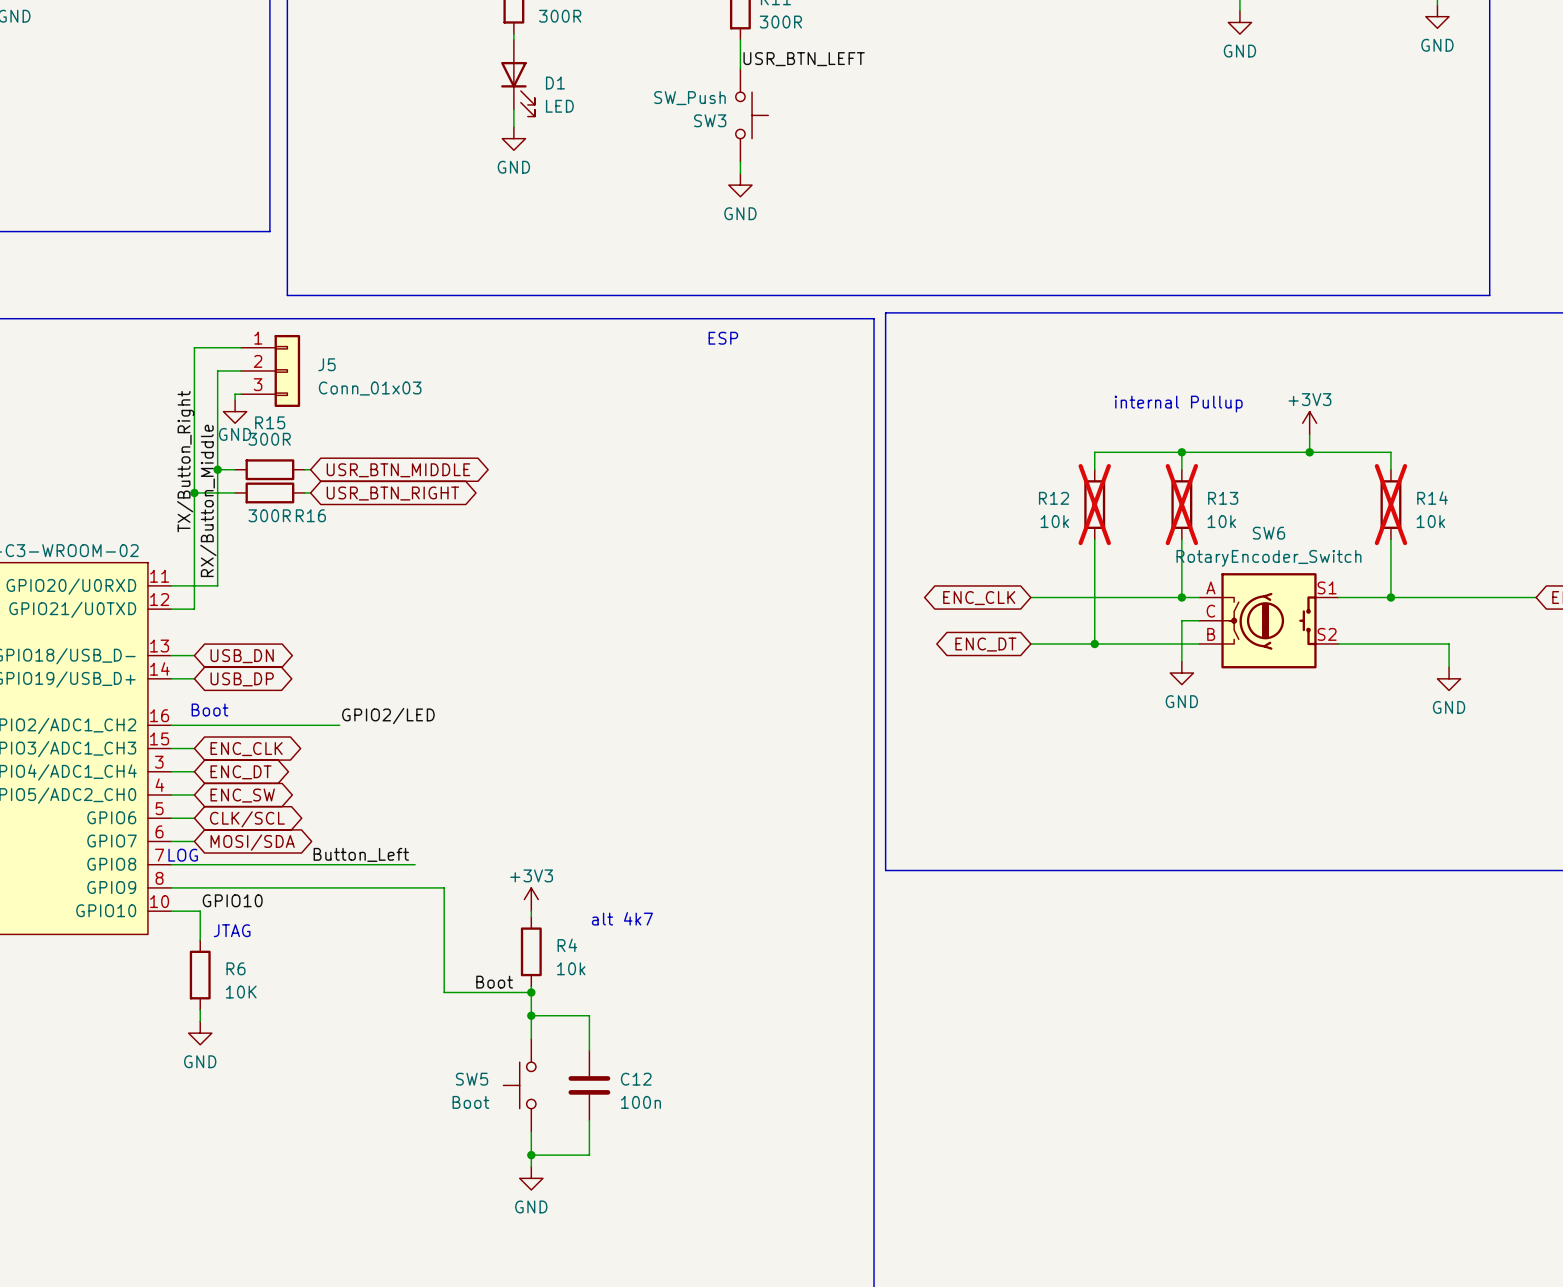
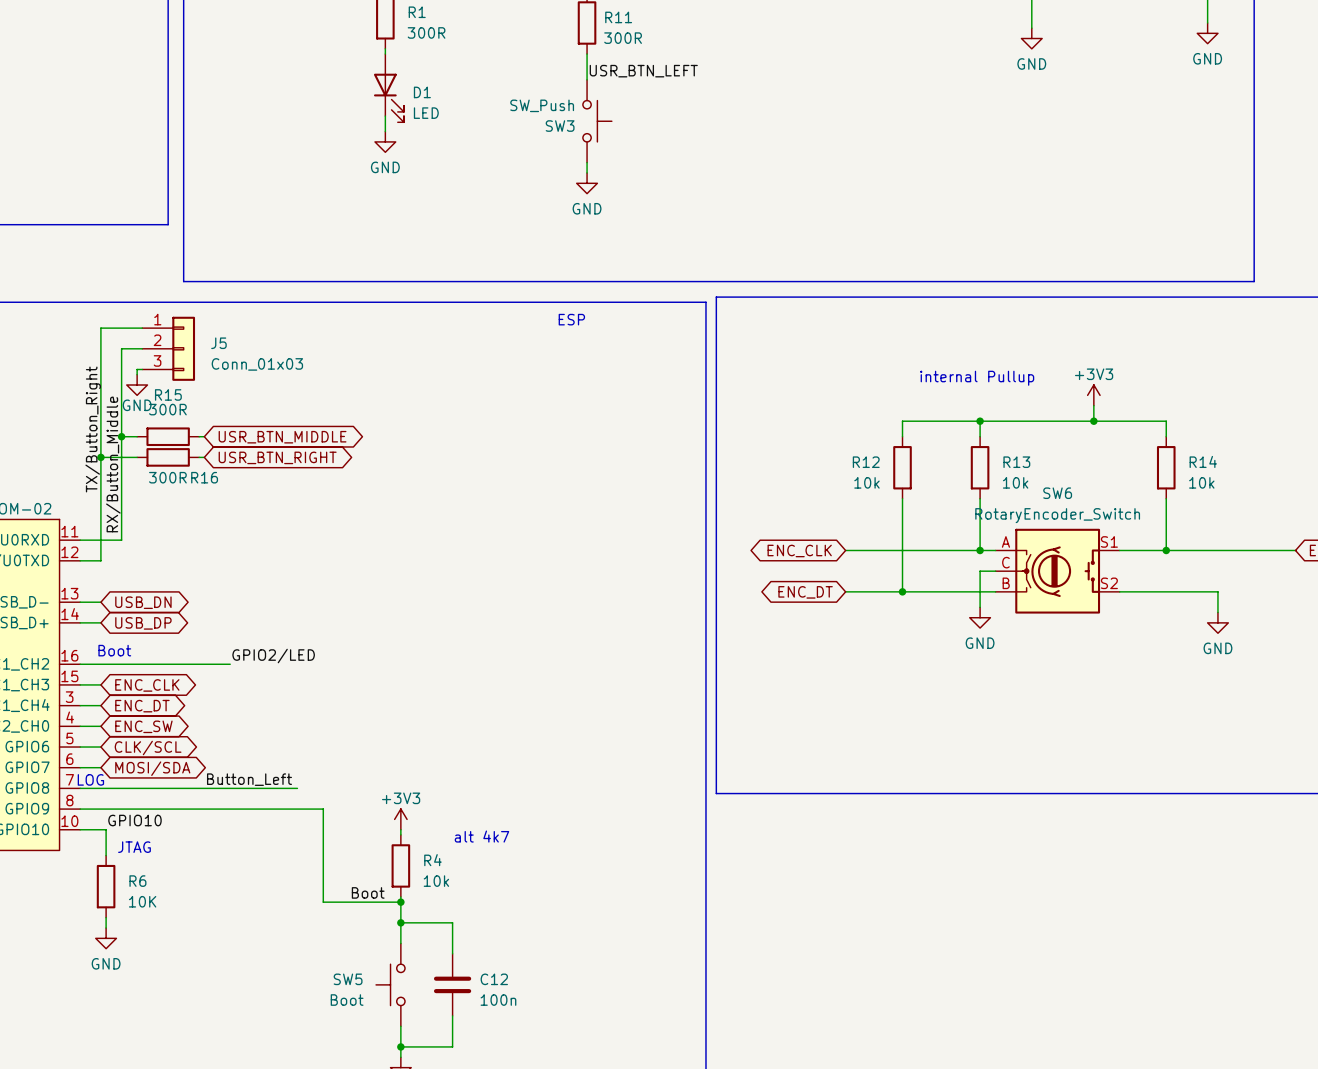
R12 do-not-place cross: (1094, 504) -> none
R13 do-not-place cross: (1181, 504) -> none
R14 do-not-place cross: (1390, 504) -> none

